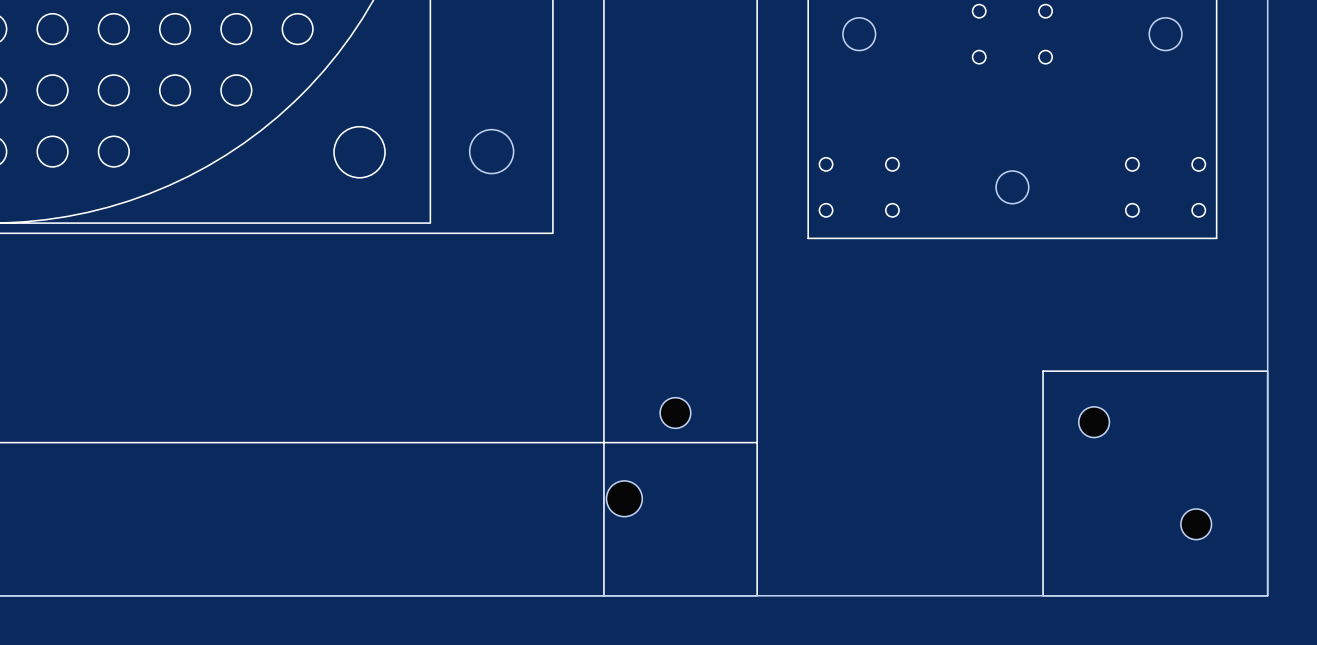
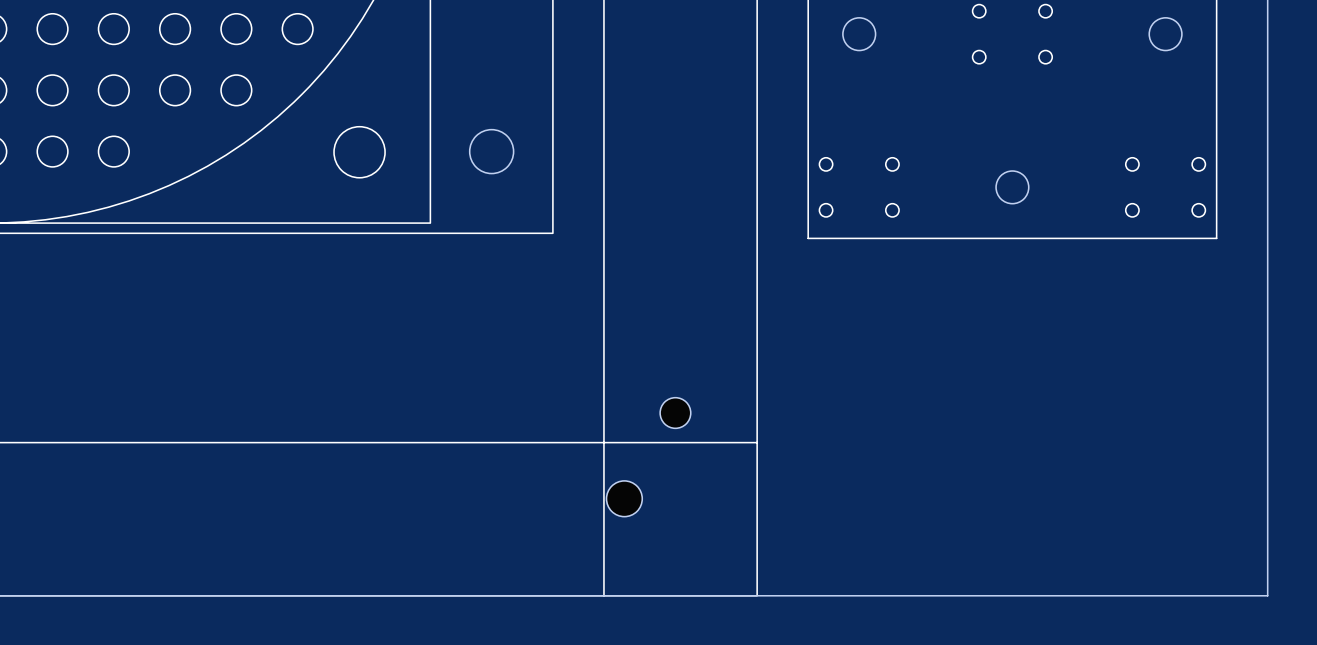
part: (1155, 483) -> none

